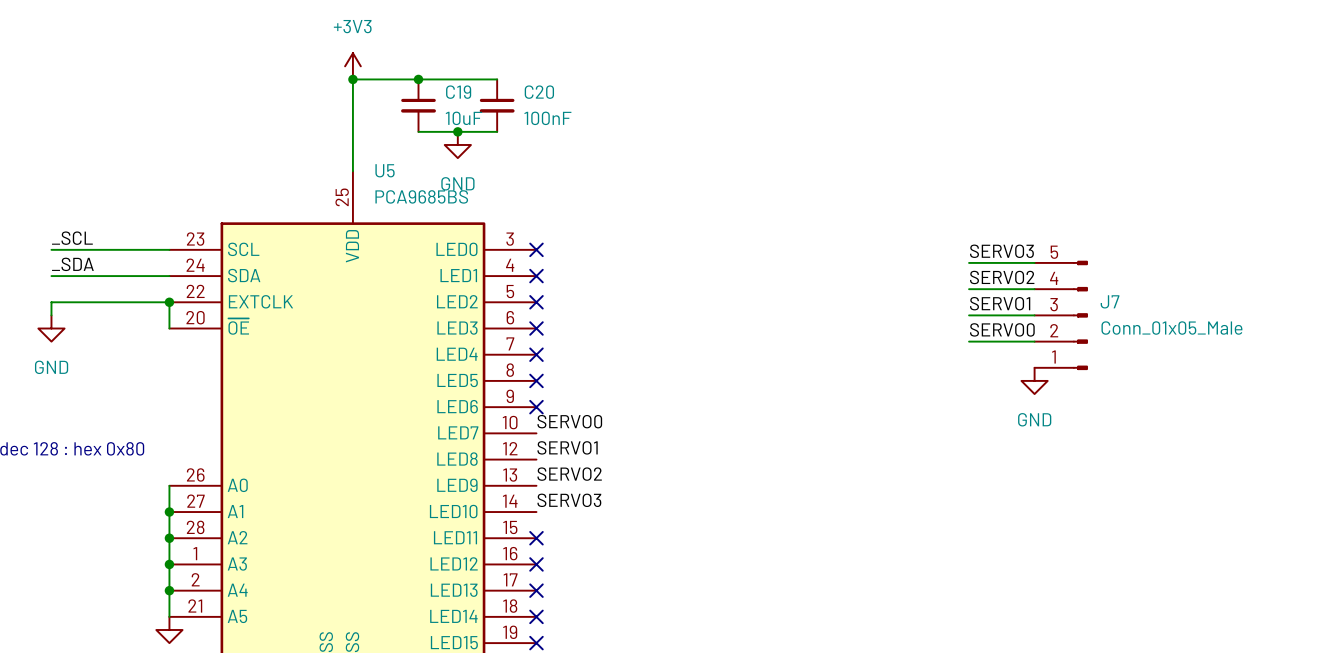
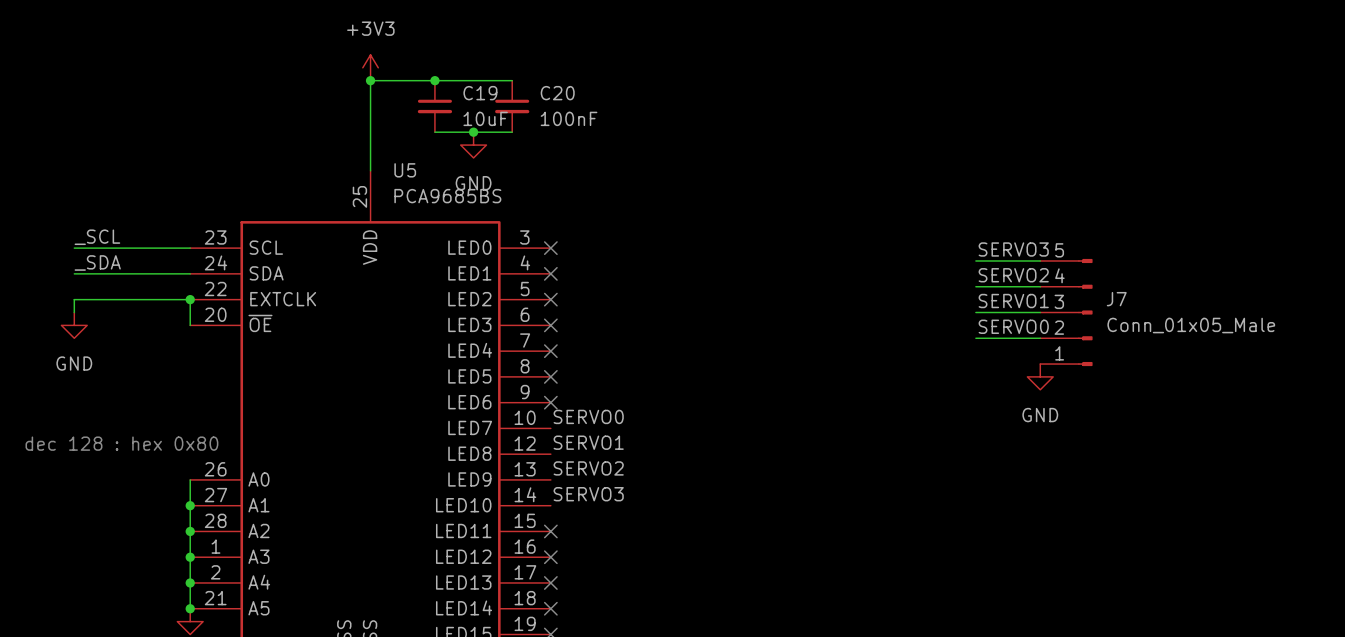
junction: none -> (190, 608)

